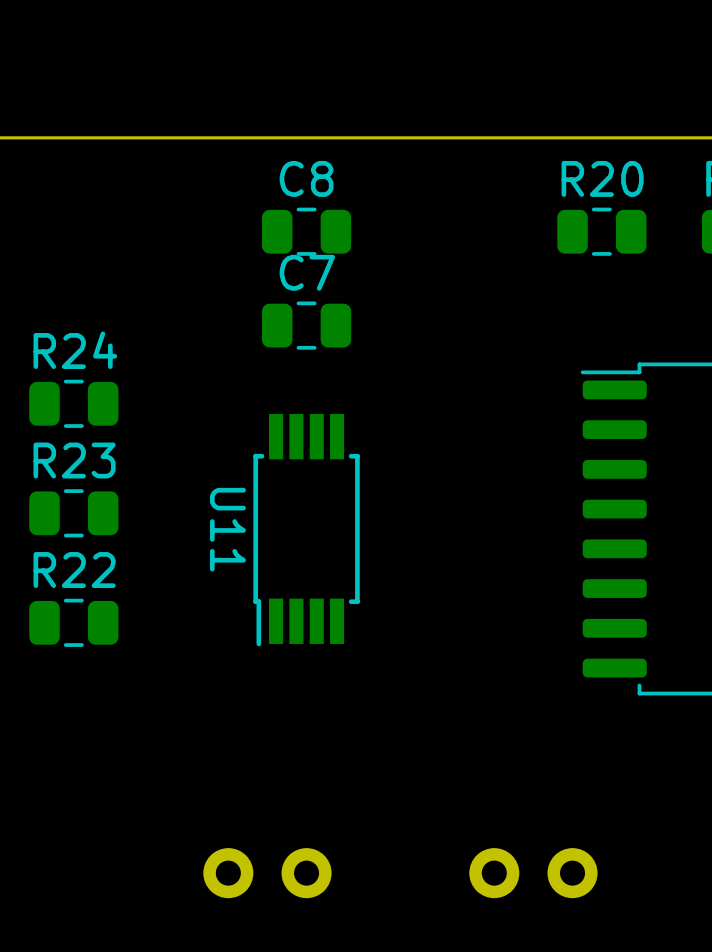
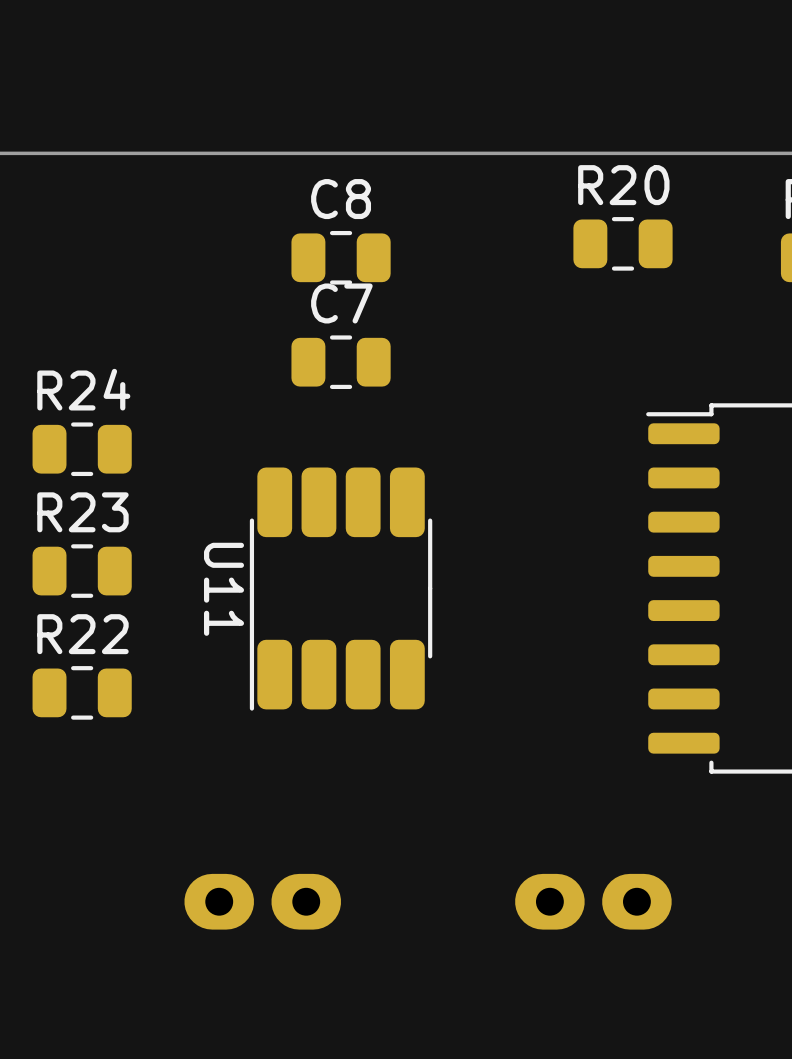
R20 position: (601, 231) -> (623, 243)
U11 footprint: [253, 413, 360, 647] -> [249, 467, 433, 711]
part: none -> (262, 901)
part: none -> (593, 901)
part: (267, 873) -> none
part: (533, 873) -> none

